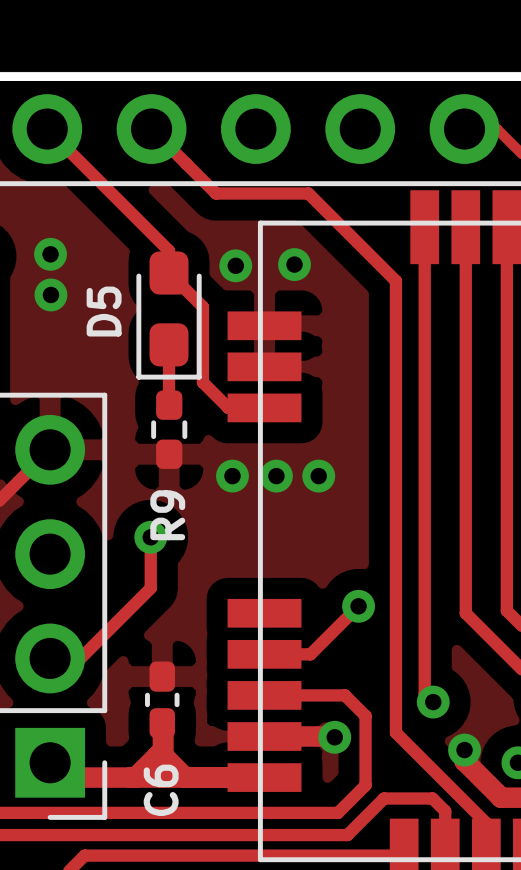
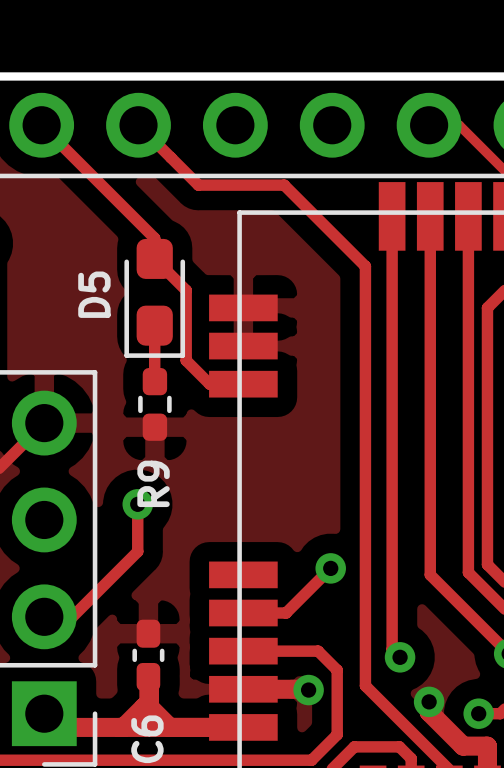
via: (50, 254) -> none
via: (294, 264) -> none
via: (235, 265) -> none
via: (50, 294) -> none
via: (232, 476) -> none
via: (276, 476) -> none
via: (318, 476) -> none

